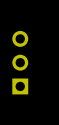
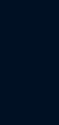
part: (20, 62) -> none

